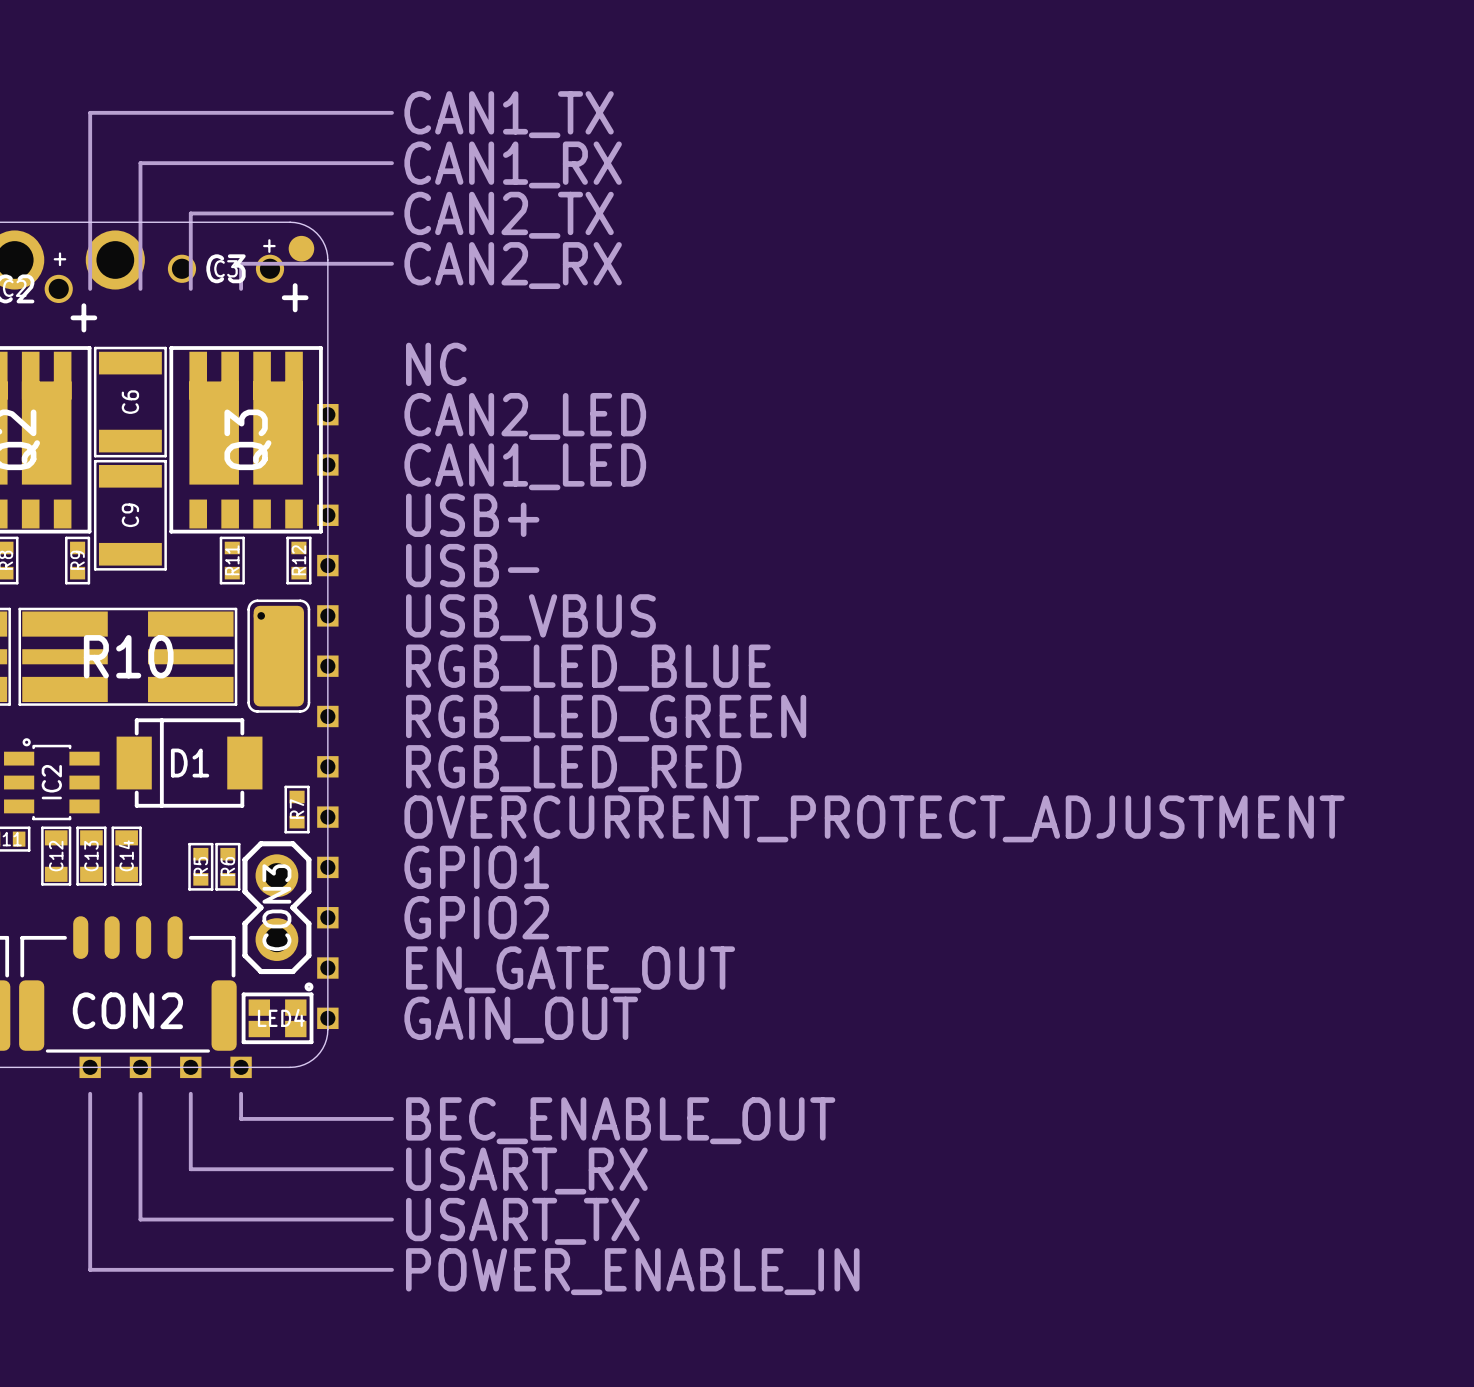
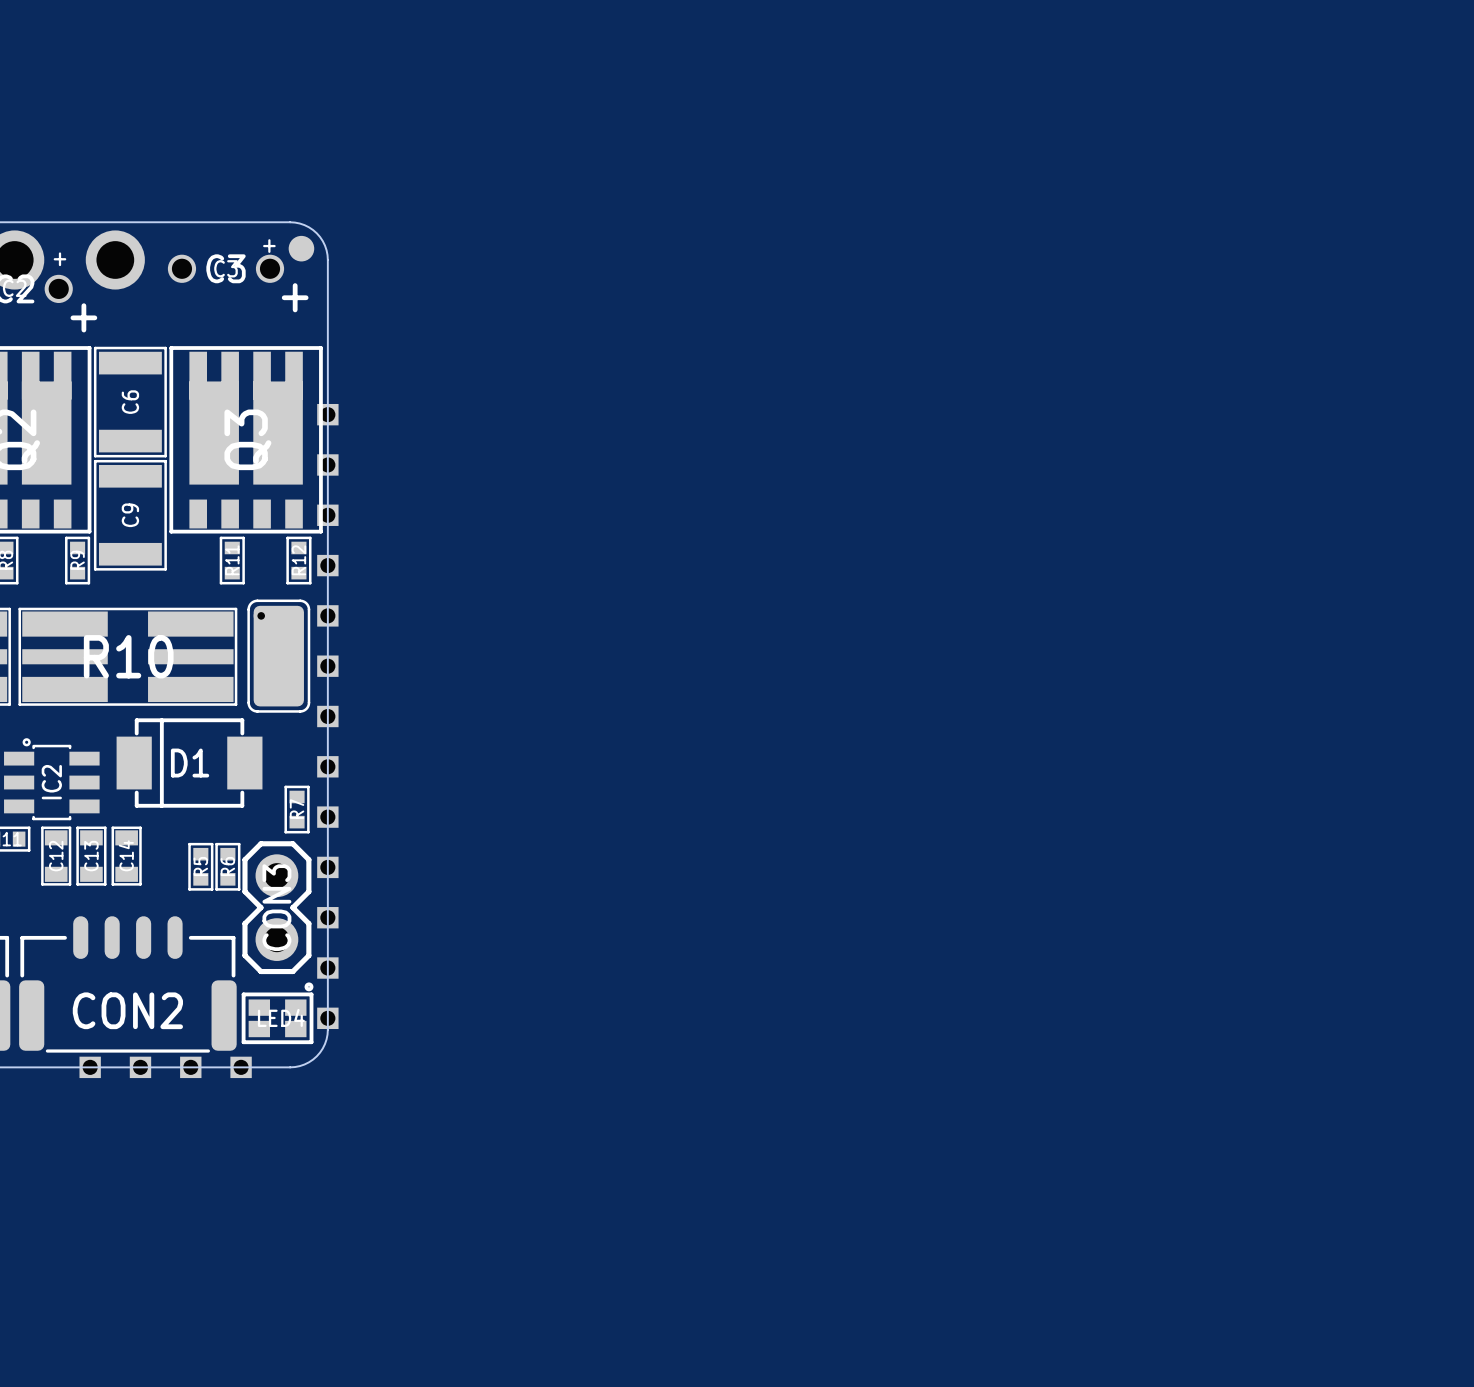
line: (392, 112) (90, 112) (90, 288) -> none
text: CAN1_TX (509, 114) -> none
line: (392, 163) (140, 163) (140, 288) -> none
text: CAN1_RX (513, 164) -> none
line: (392, 213) (190, 213) (190, 288) -> none
text: CAN2_TX (509, 215) -> none
line: (392, 263) (241, 263) (241, 288) -> none
text: CAN2_RX (513, 265) -> none
text: NC (436, 364) -> none
text: CAN2_LED (525, 416) -> none
text: CAN1_LED (525, 466) -> none
text: USB+ (472, 515) -> none
text: USB- (472, 565) -> none
text: USB_VBUS (530, 617) -> none
text: RGB_LED_BLUE (588, 667) -> none
text: RGB_LED_GREEN (606, 718) -> none
text: RGB_LED_RED (573, 768) -> none
text: OVERCURRENT_PROTECT_ADJUSTMENT (874, 818) -> none
text: GPIO1 (476, 867) -> none
text: GPIO2 (476, 917) -> none
text: EN_GATE_OUT (570, 969) -> none
text: GAIN_OUT (521, 1020) -> none
line: (90, 1093) (90, 1269) (392, 1269) -> none
line: (140, 1093) (140, 1219) (392, 1219) -> none
line: (190, 1093) (190, 1169) (392, 1169) -> none
line: (241, 1093) (241, 1118) (392, 1118) -> none
text: BEC_ENABLE_OUT (620, 1120) -> none
text: USART_RX (526, 1171) -> none
text: USART_TX (522, 1221) -> none
text: POWER_ENABLE_IN (632, 1271) -> none

